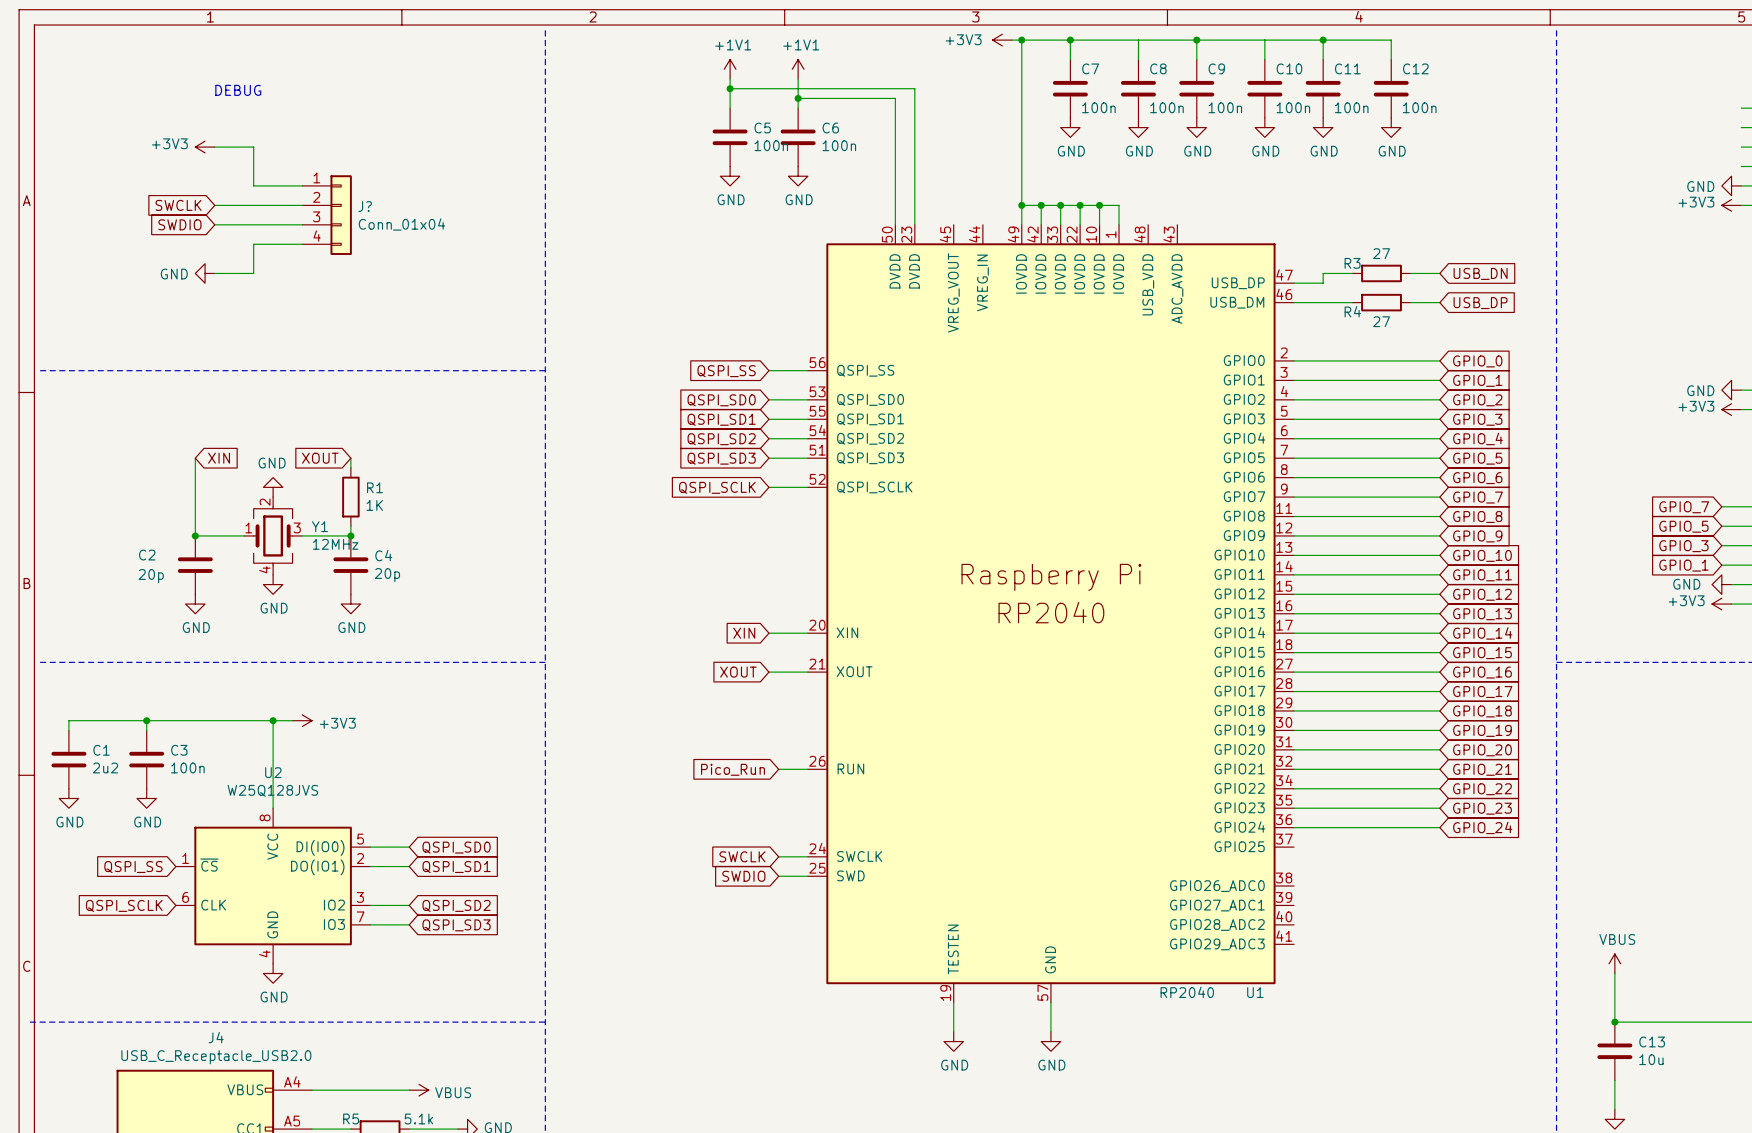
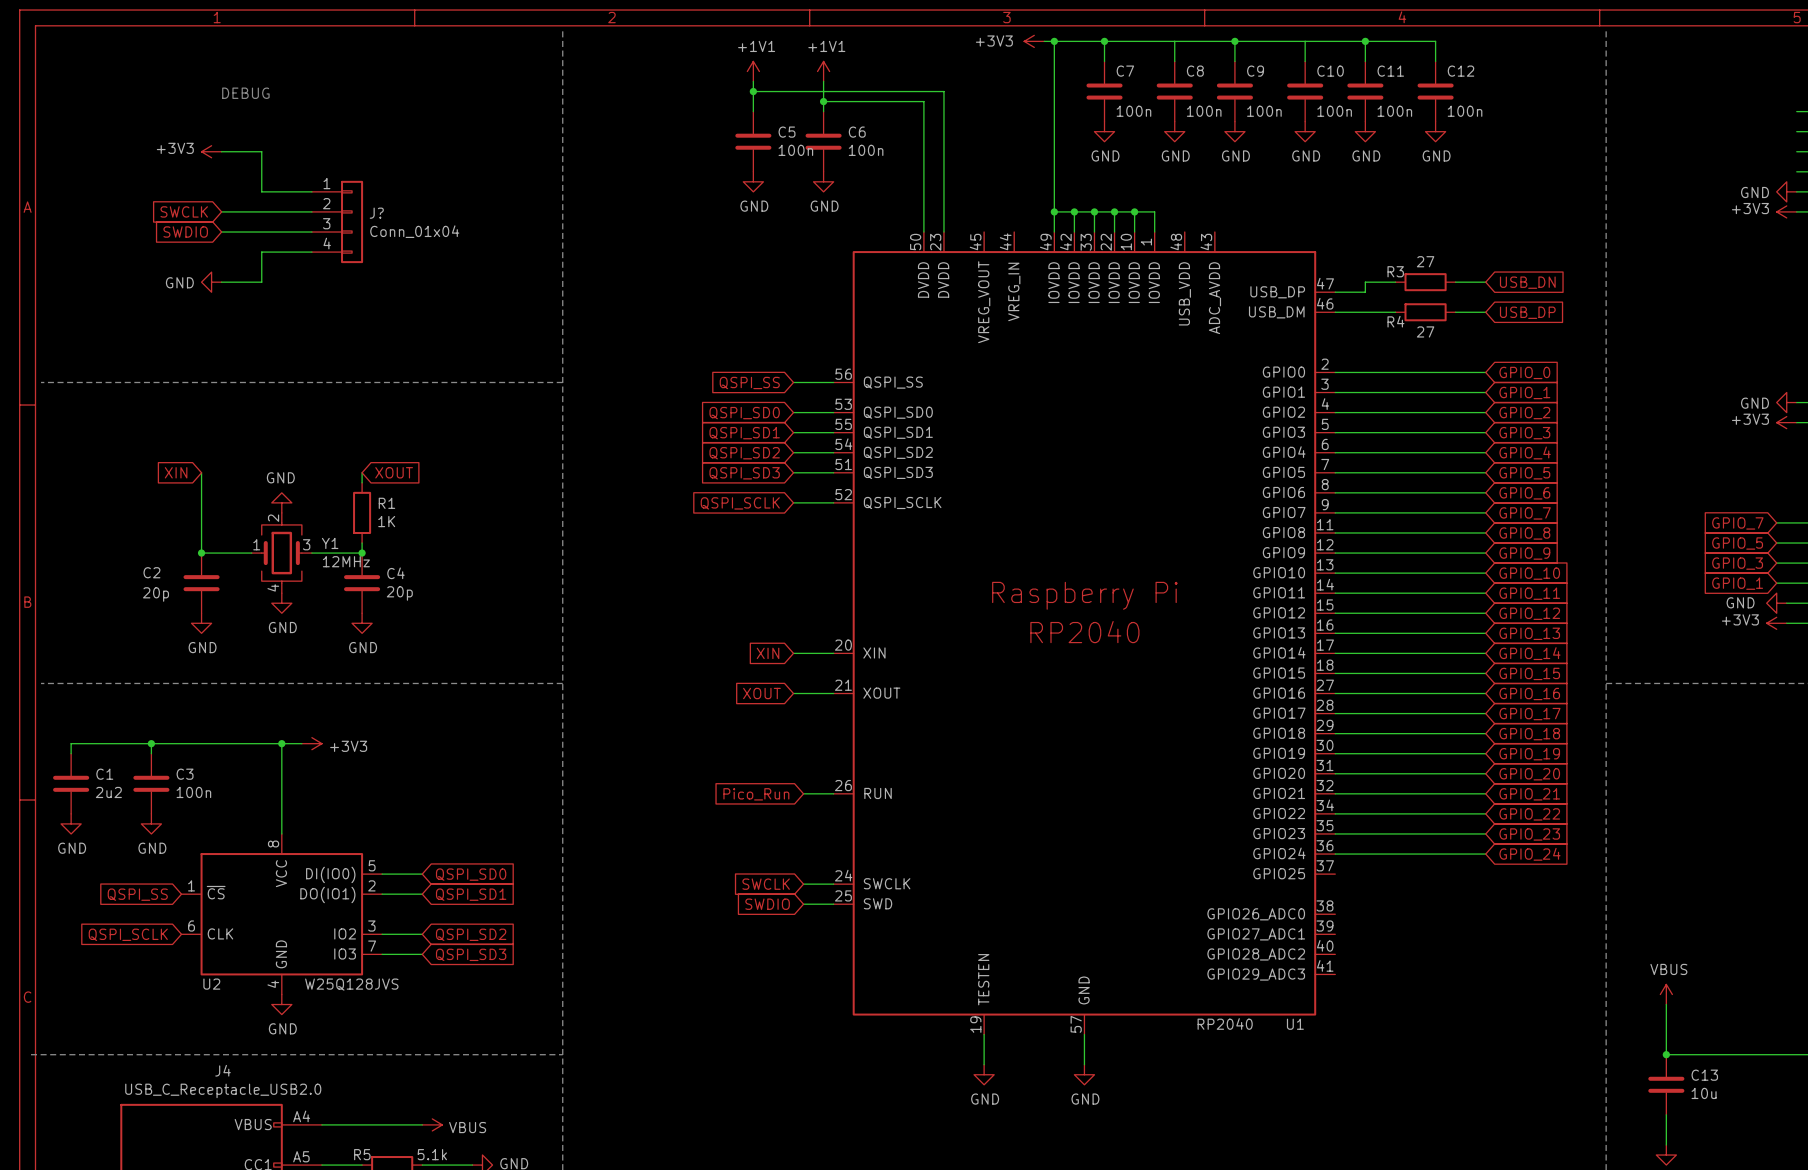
global label rotation: 0° (219, 458) -> 180° (176, 472)
global label rotation: 0° (320, 458) -> 180° (394, 472)
U2 name position: U2 (273, 772) -> U2 (211, 984)
U2 value position: W25Q128JVS (272, 790) -> W25Q128JVS (351, 984)

